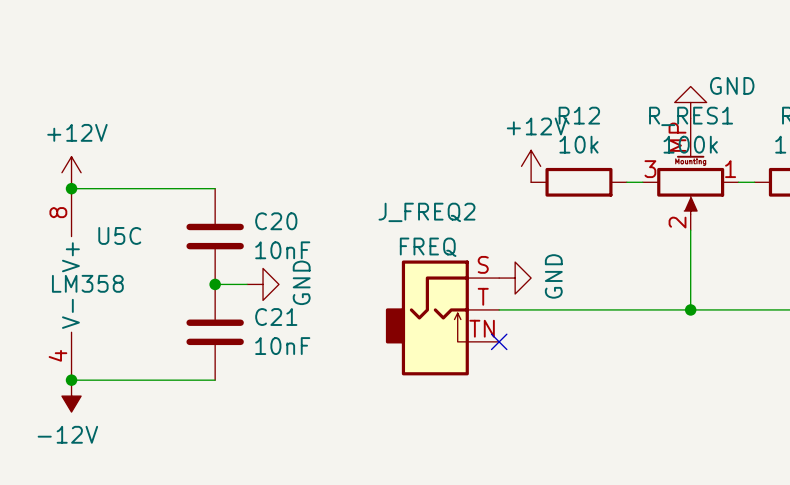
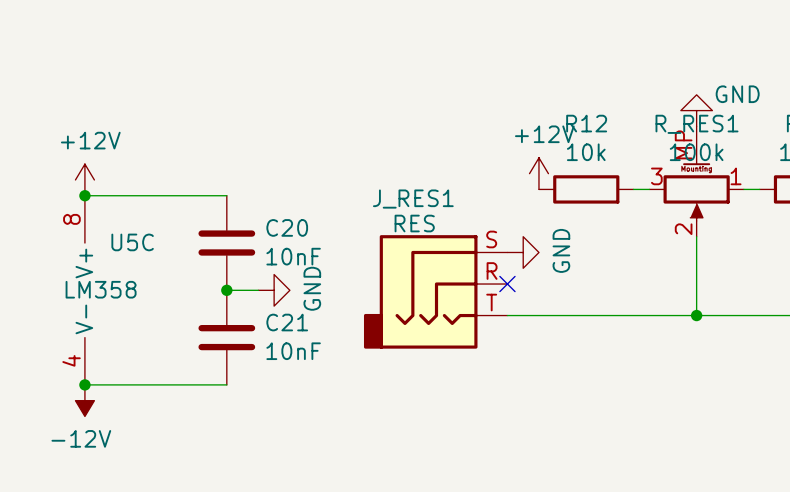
power symbol position: GND (515, 278) -> GND (523, 252)
J_RES1: none -> RES (435, 291)
J_FREQ2: FREQ (442, 317) -> none
no-connect mark position: (499, 341) -> (507, 284)

